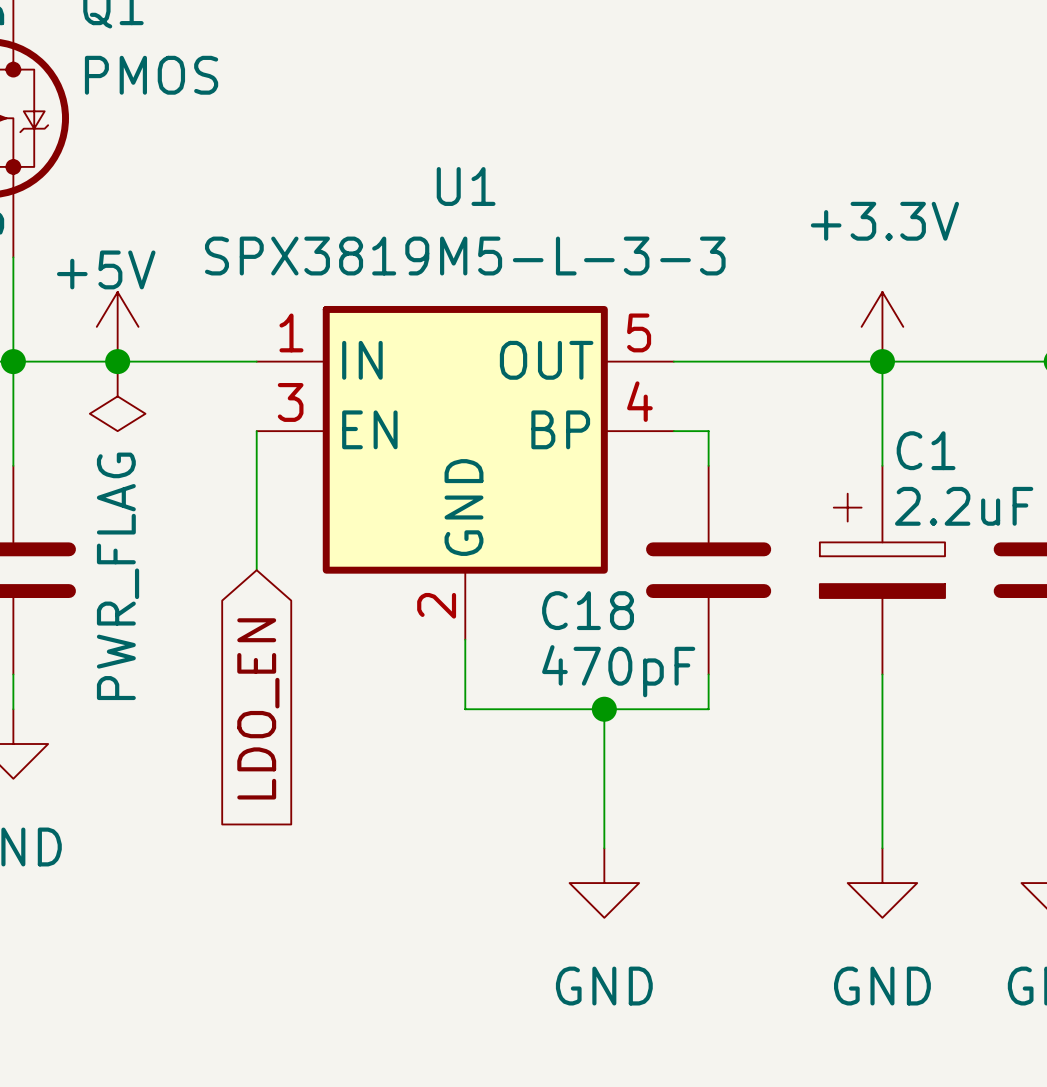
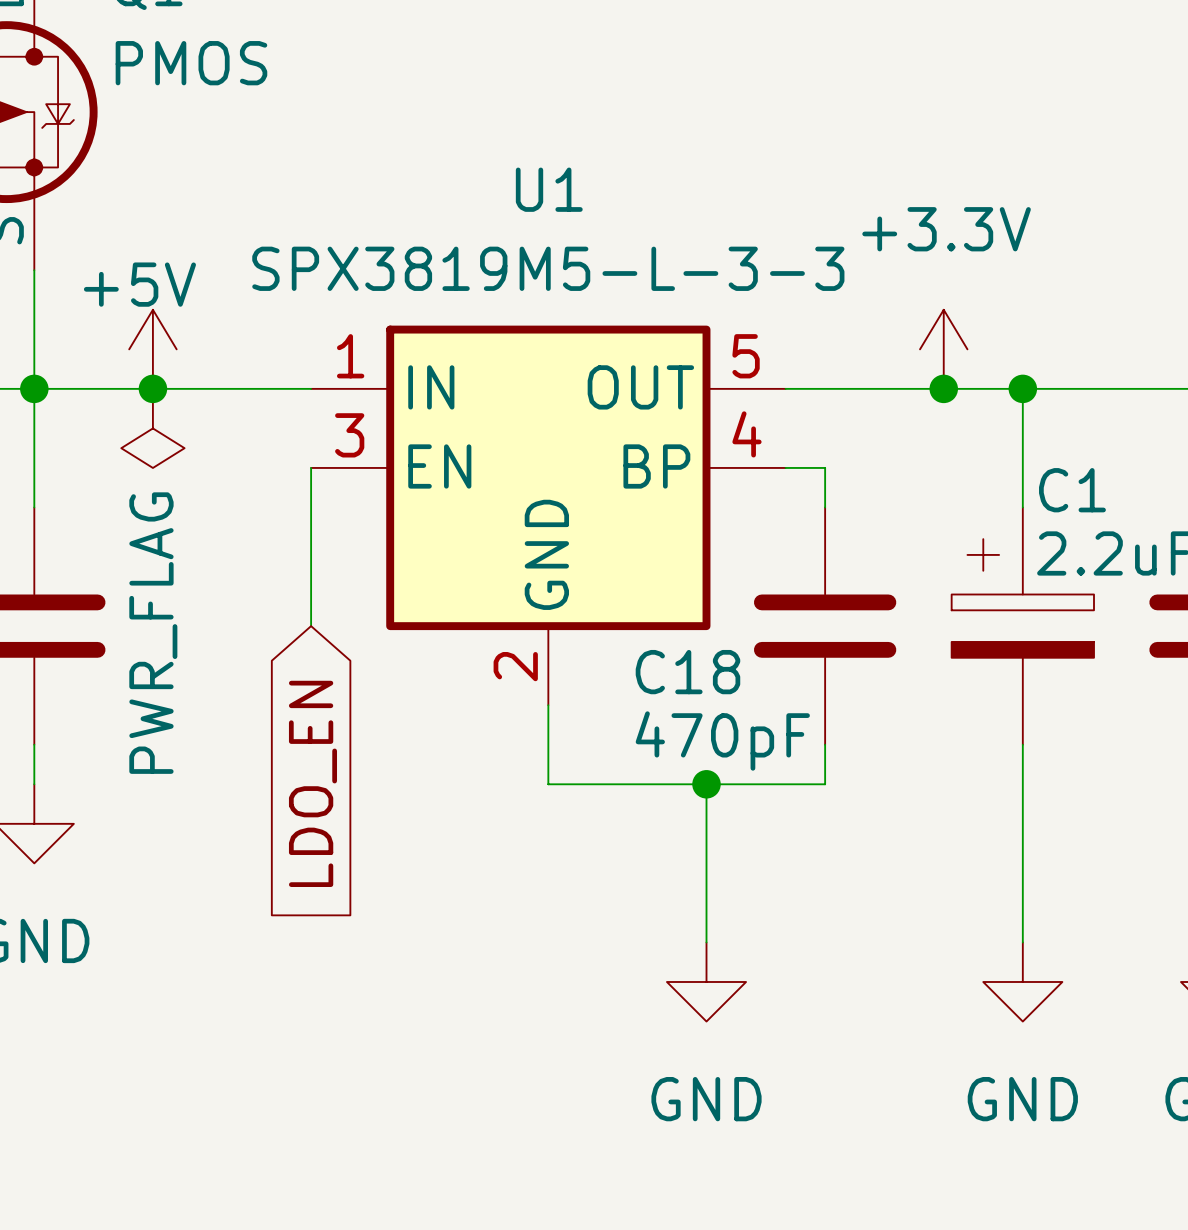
power symbol position: +3.3V (882, 326) -> +3.3V (943, 349)
junction: none -> (943, 388)

